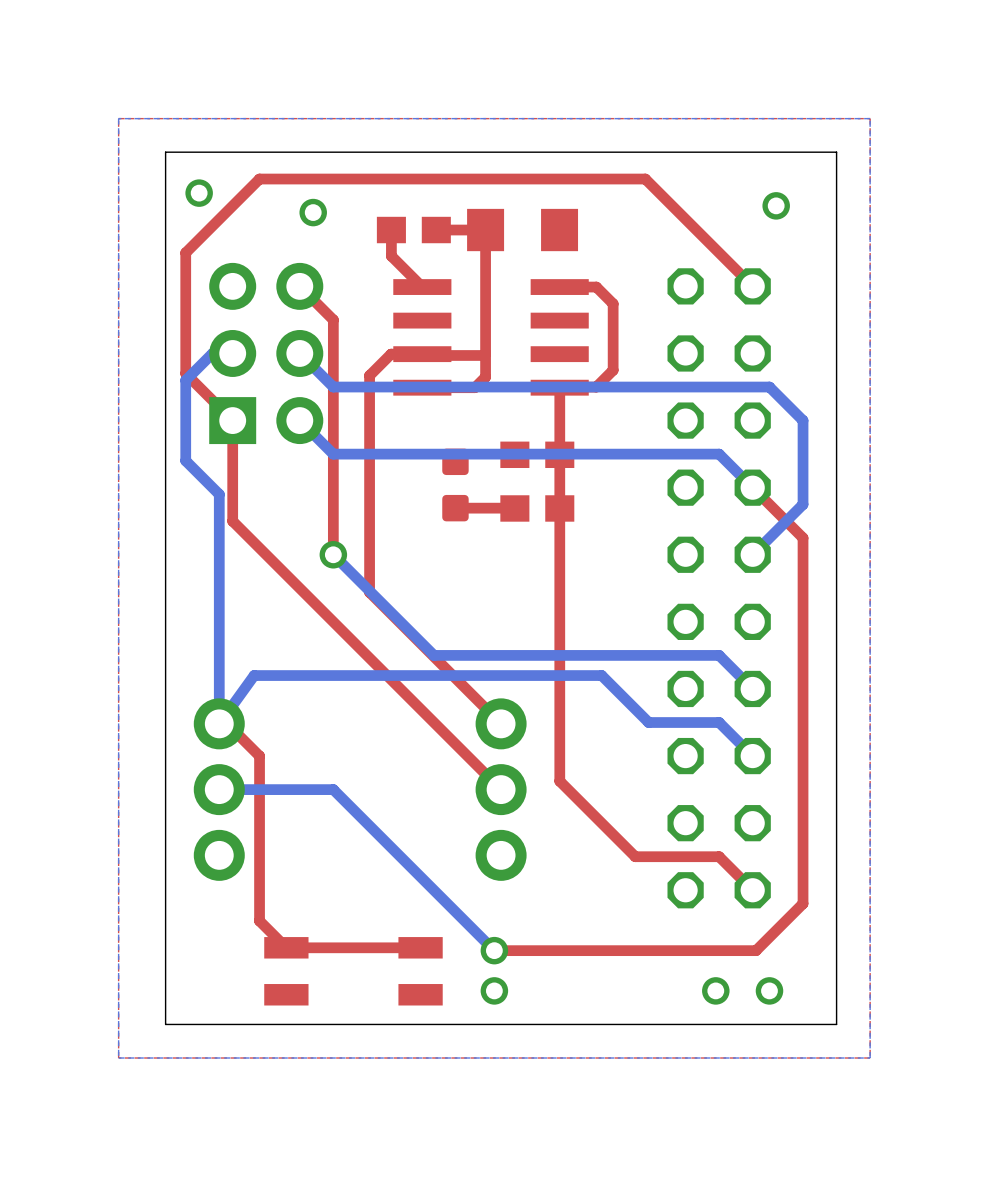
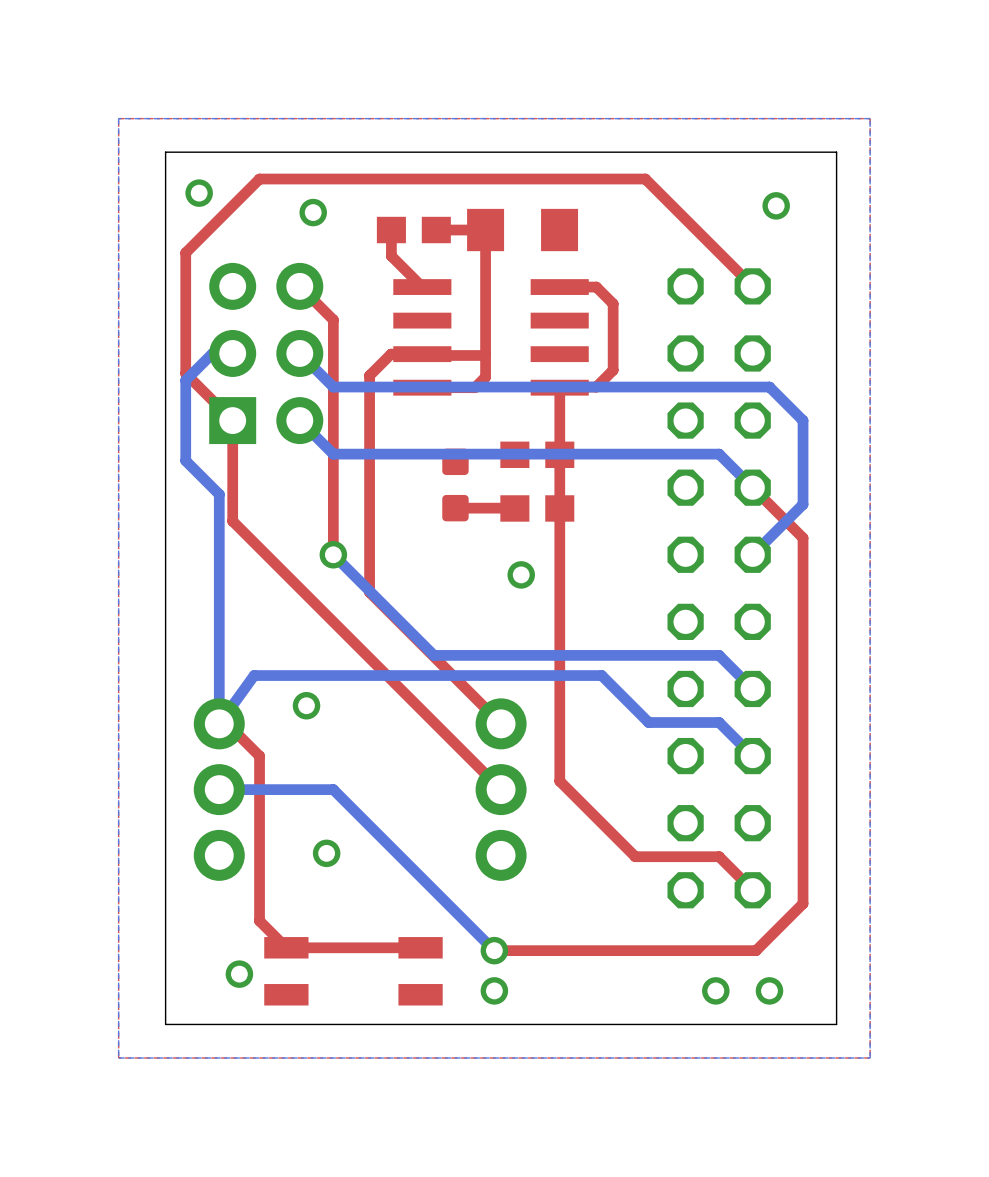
via: none -> (521, 574)
via: none -> (306, 705)
via: none -> (326, 853)
via: none -> (239, 974)

